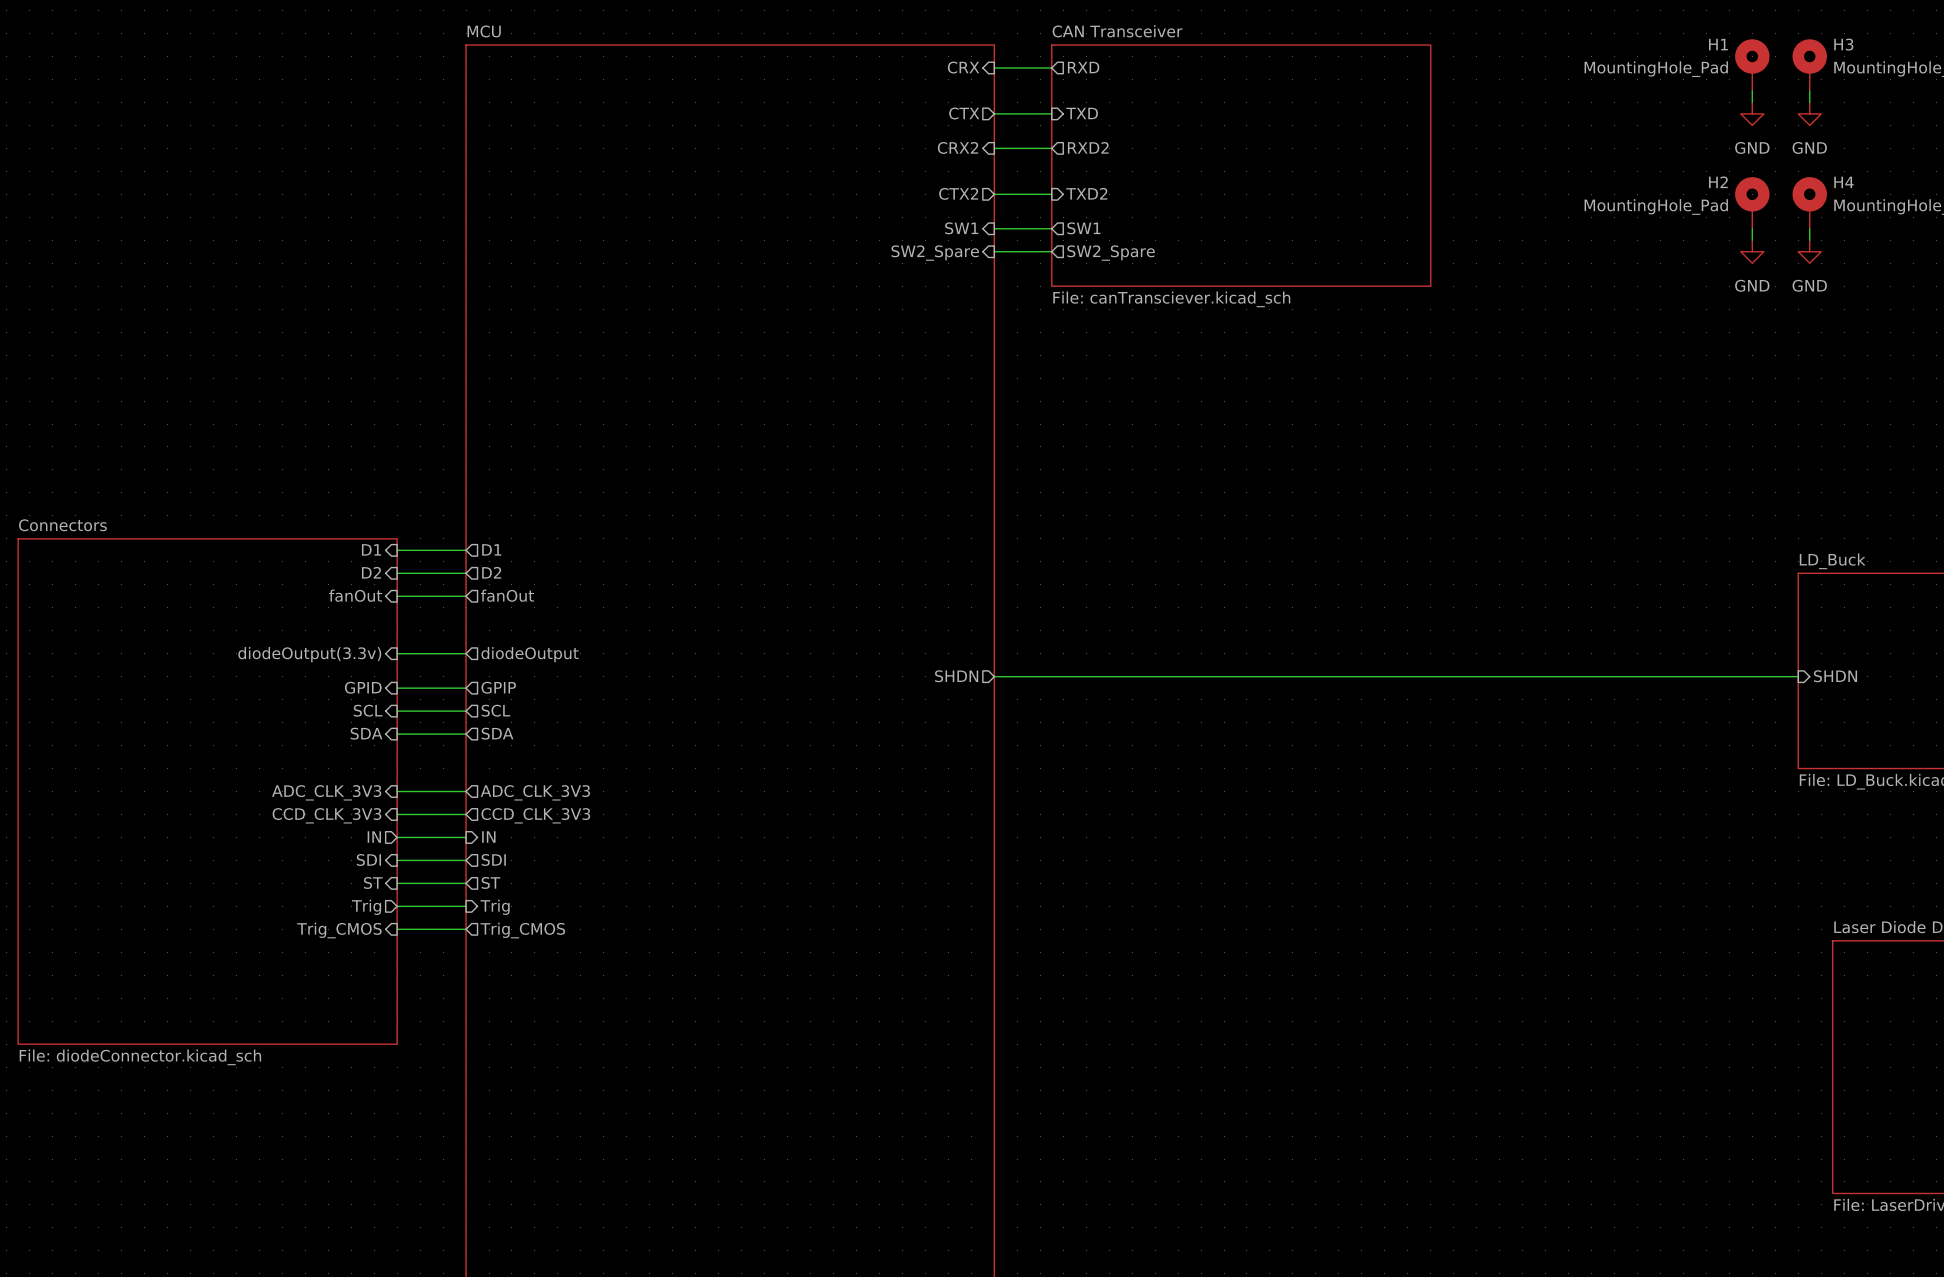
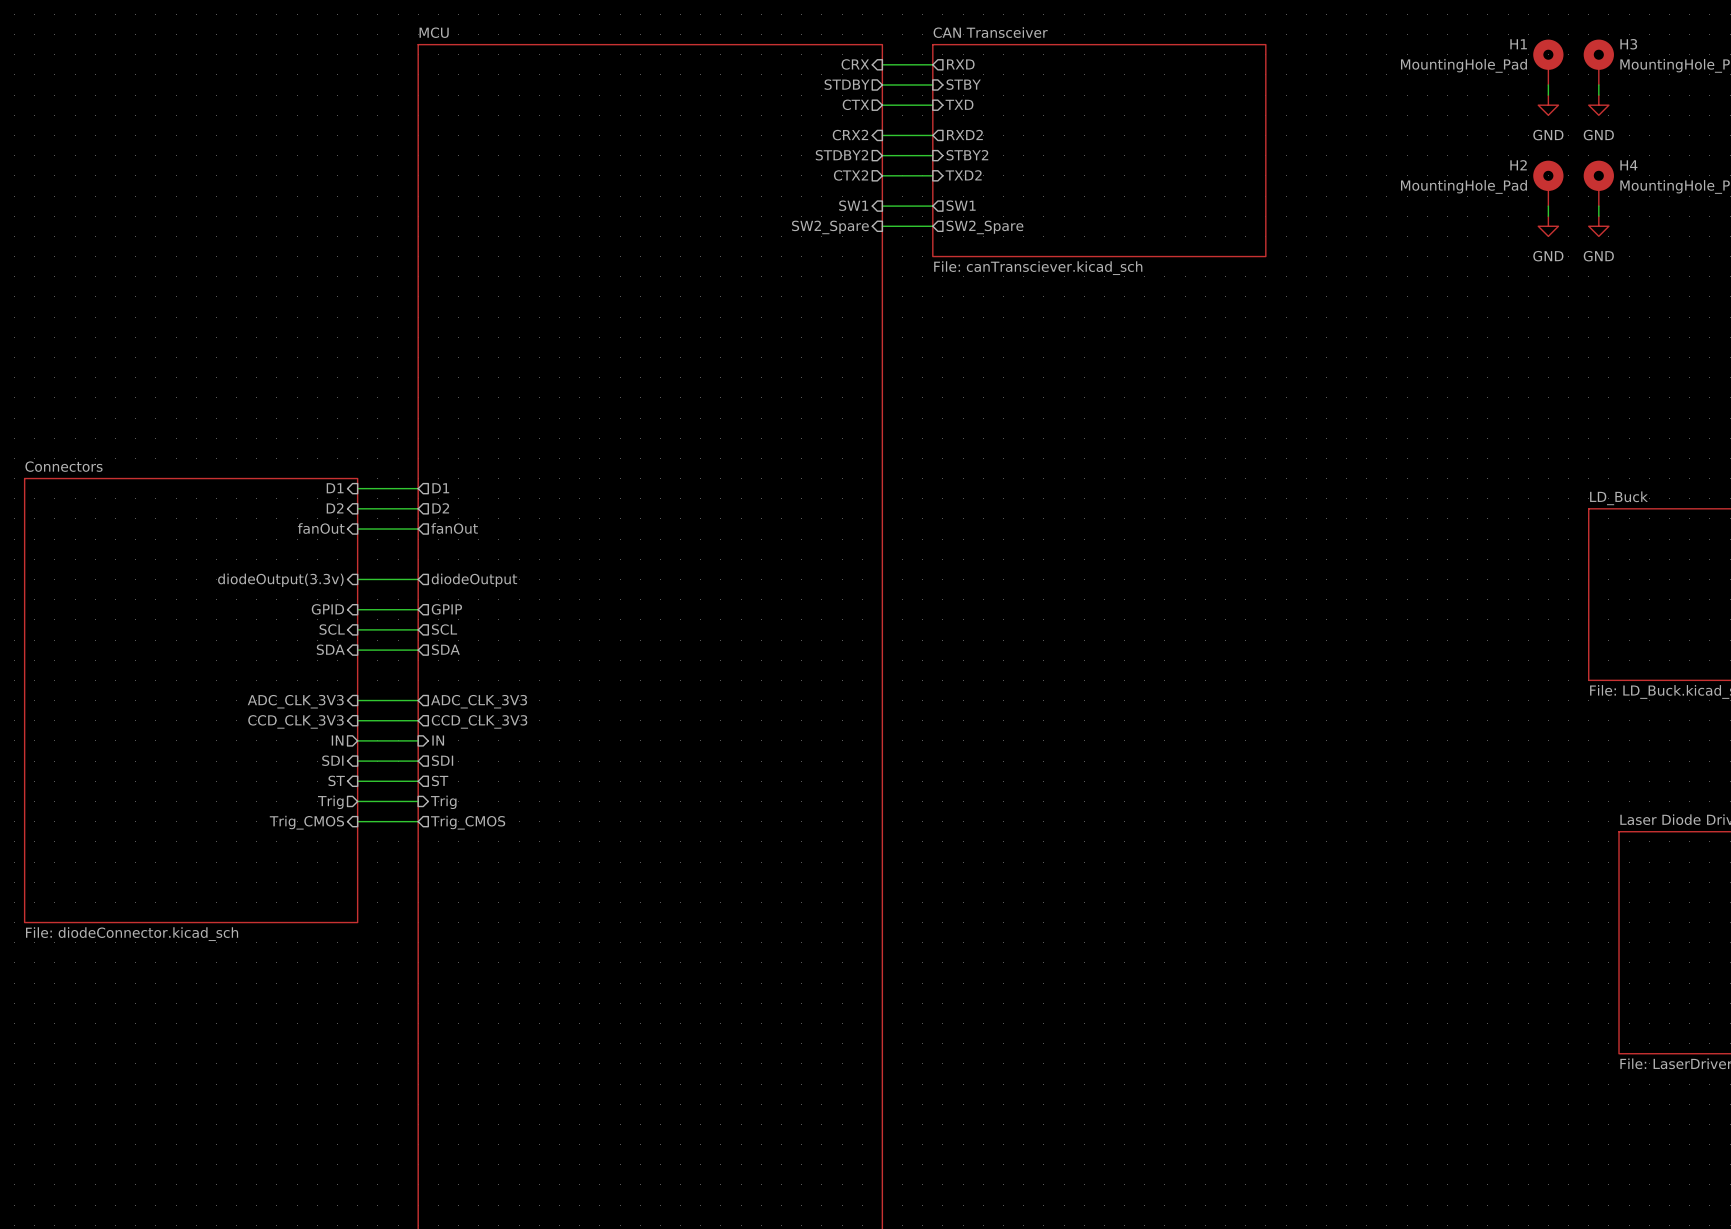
sheet pin: none -> STDBY (847, 84)
wire: none -> (882, 85) (932, 85)
sheet pin: none -> STBY (963, 84)
sheet pin: none -> STDBY2 (841, 155)
sheet pin: none -> STBY2 (967, 155)
wire: none -> (882, 155) (932, 155)
sheet pin: SHDN (956, 676) -> none
wire: (994, 676) (1798, 676) -> none
sheet pin: SHDN (1835, 676) -> none

